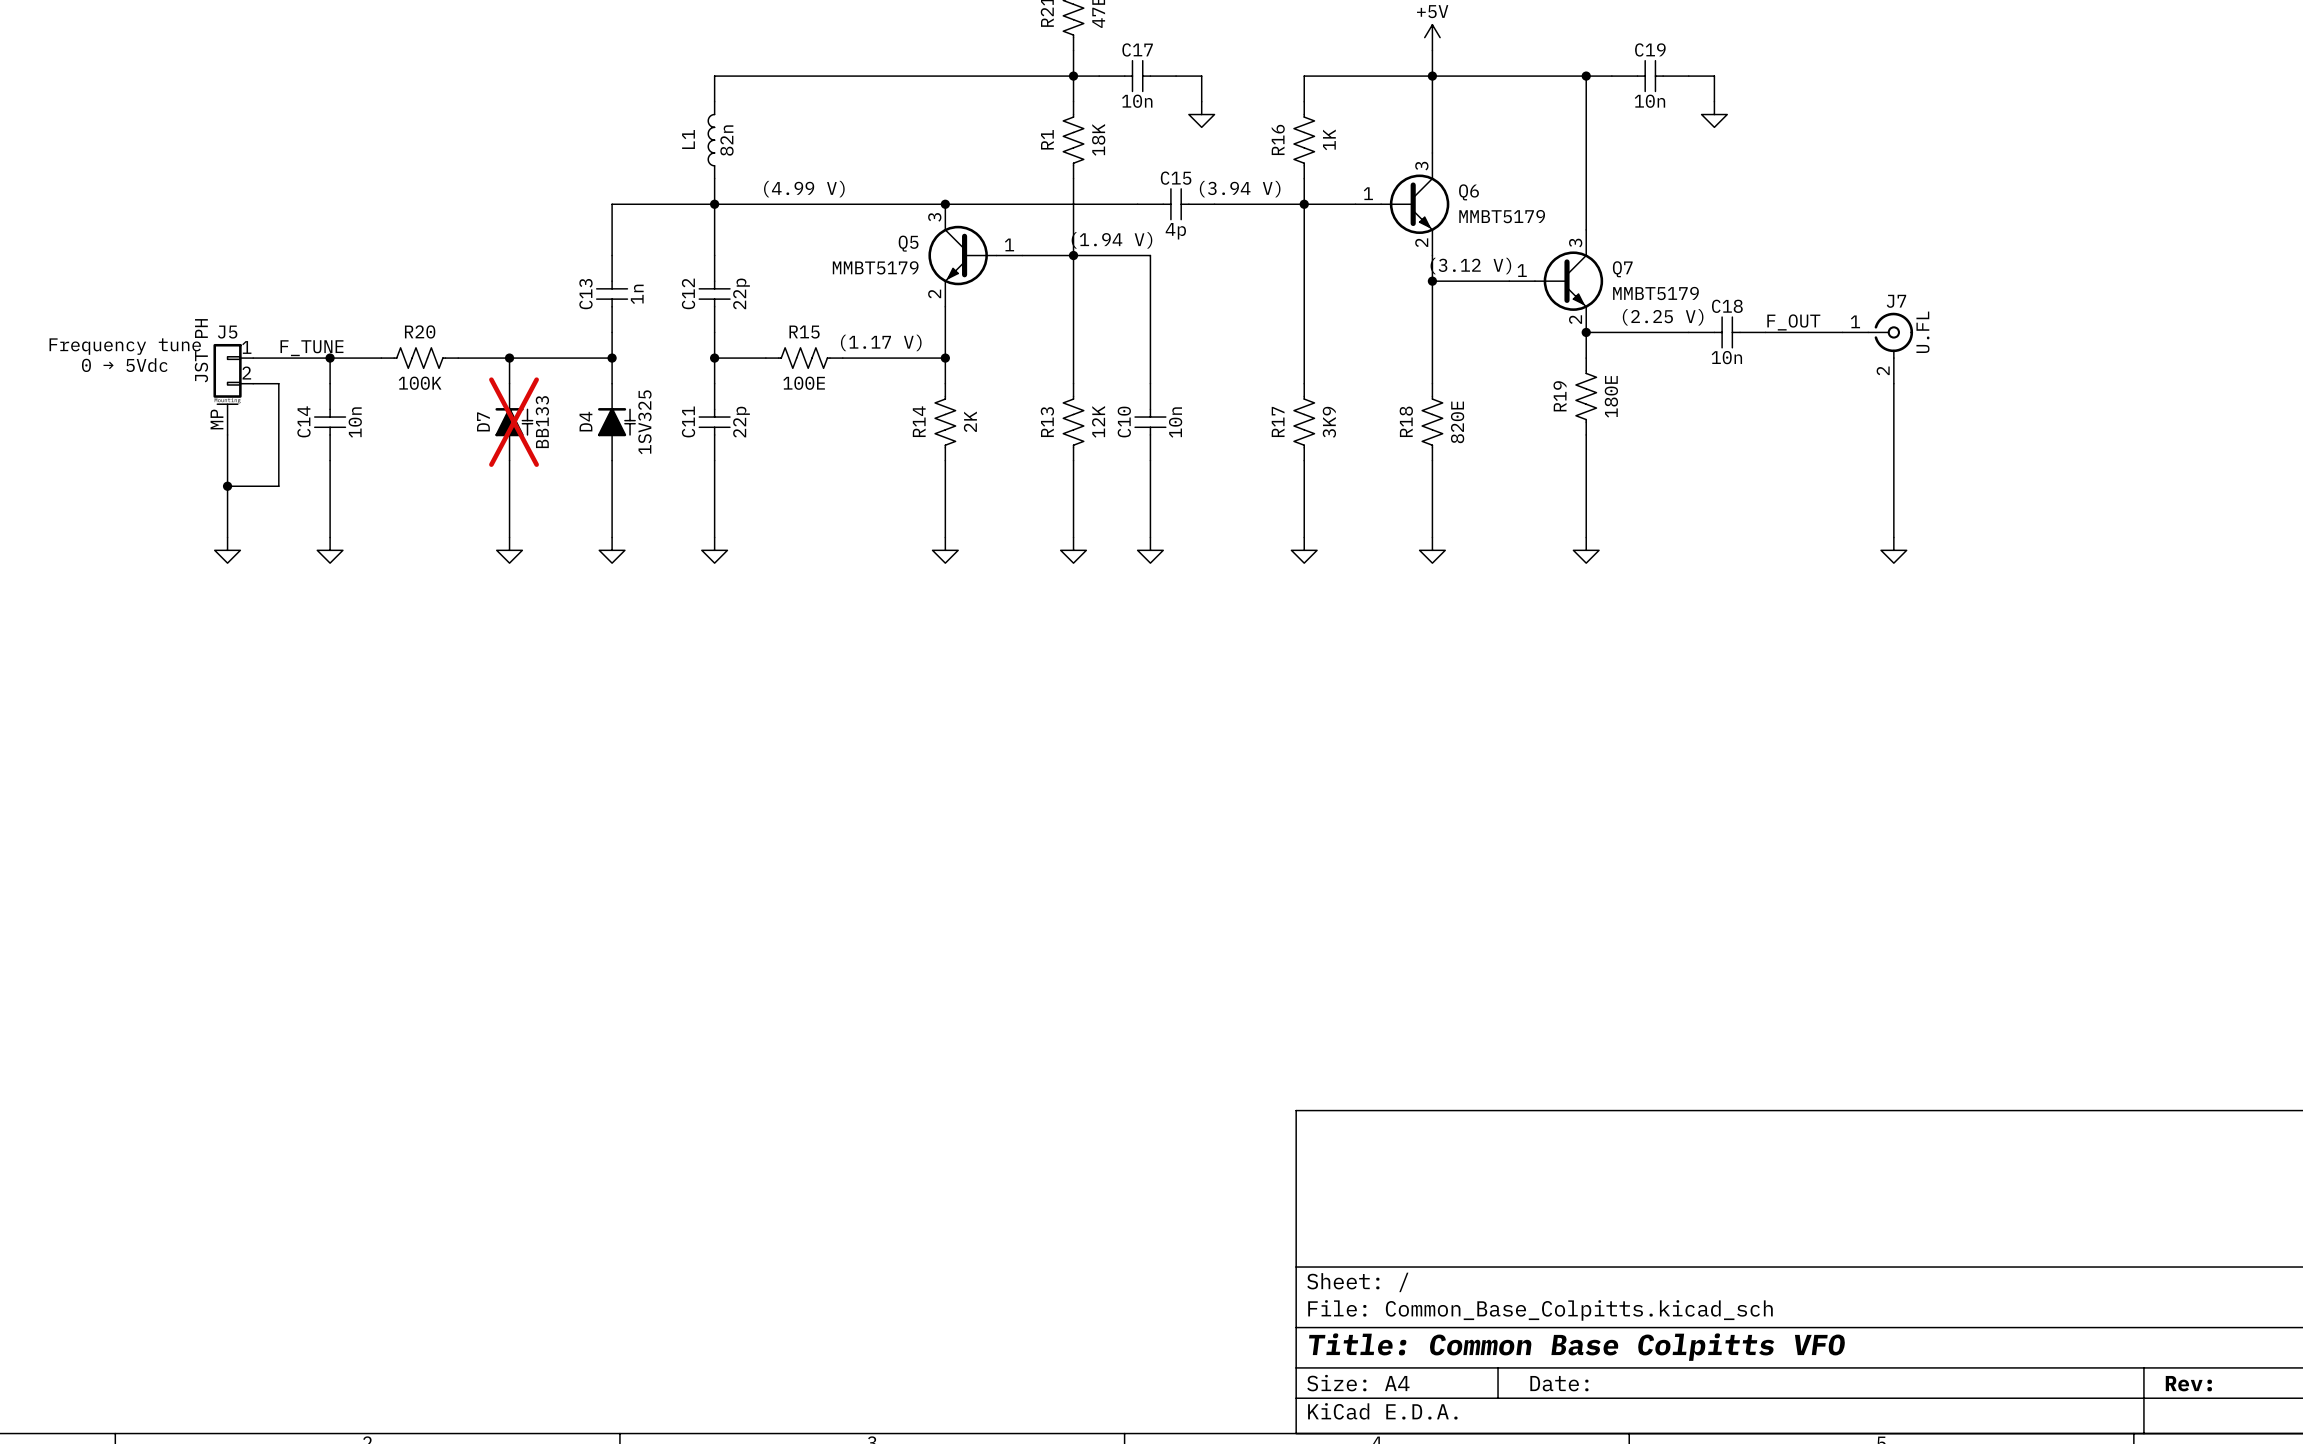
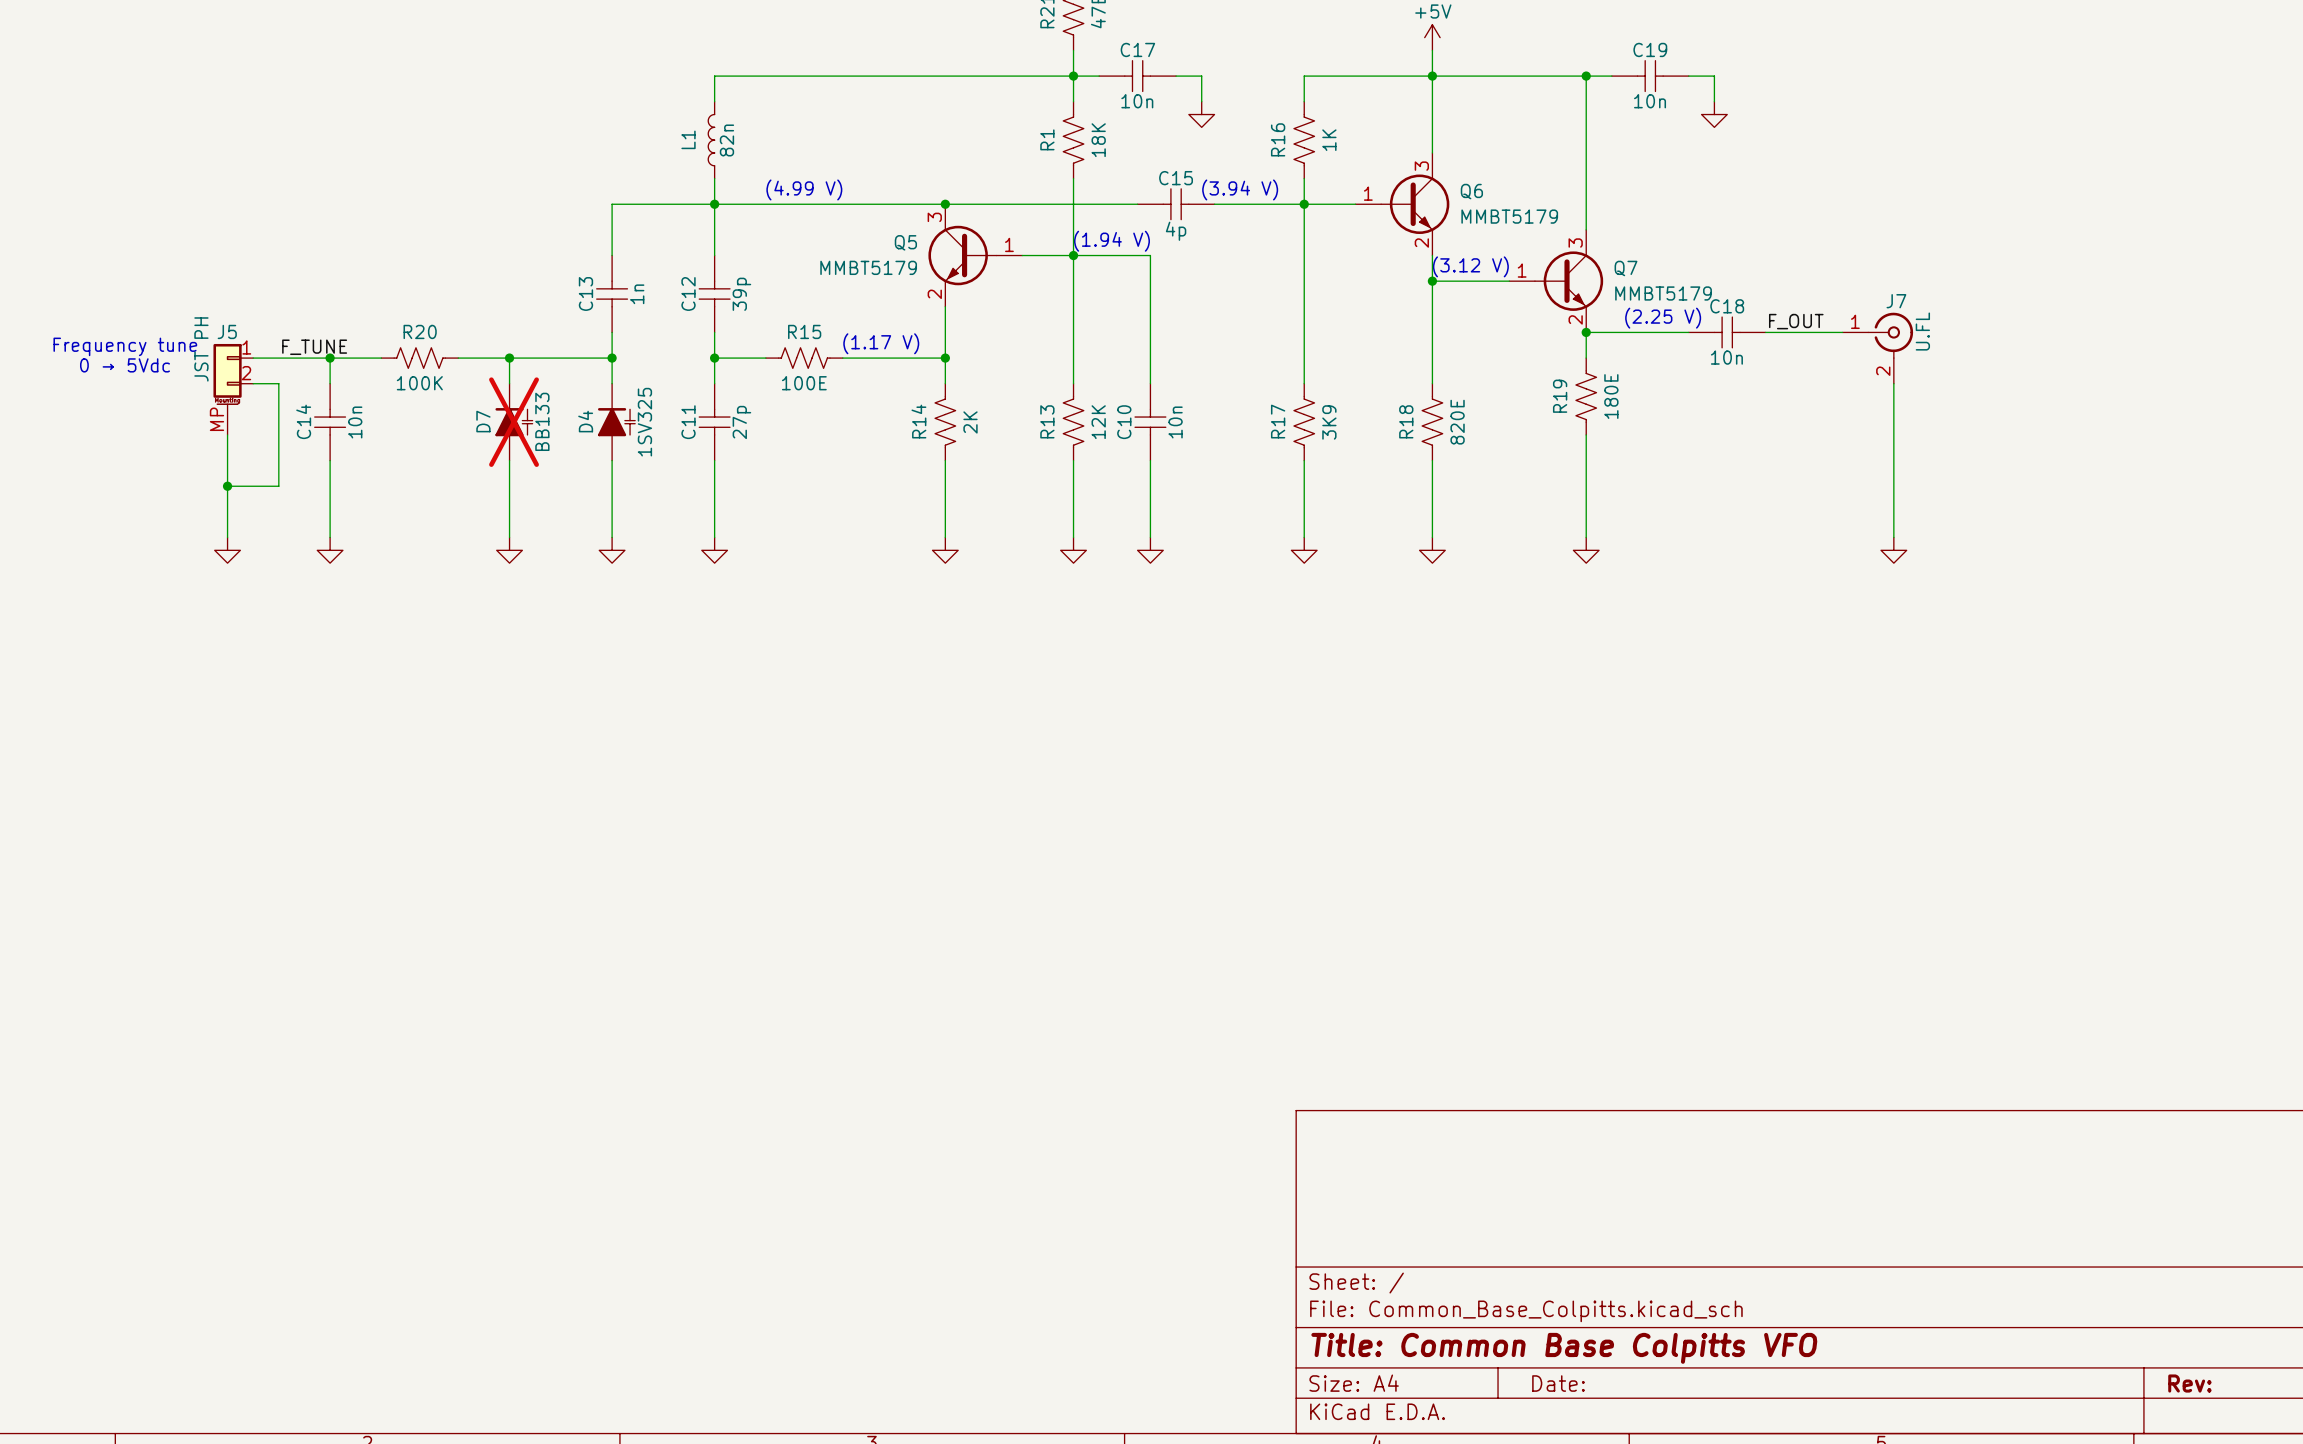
C12 value: 22p (741, 293) -> 39p (741, 294)
C11 value: 22p (741, 422) -> 27p (741, 422)

